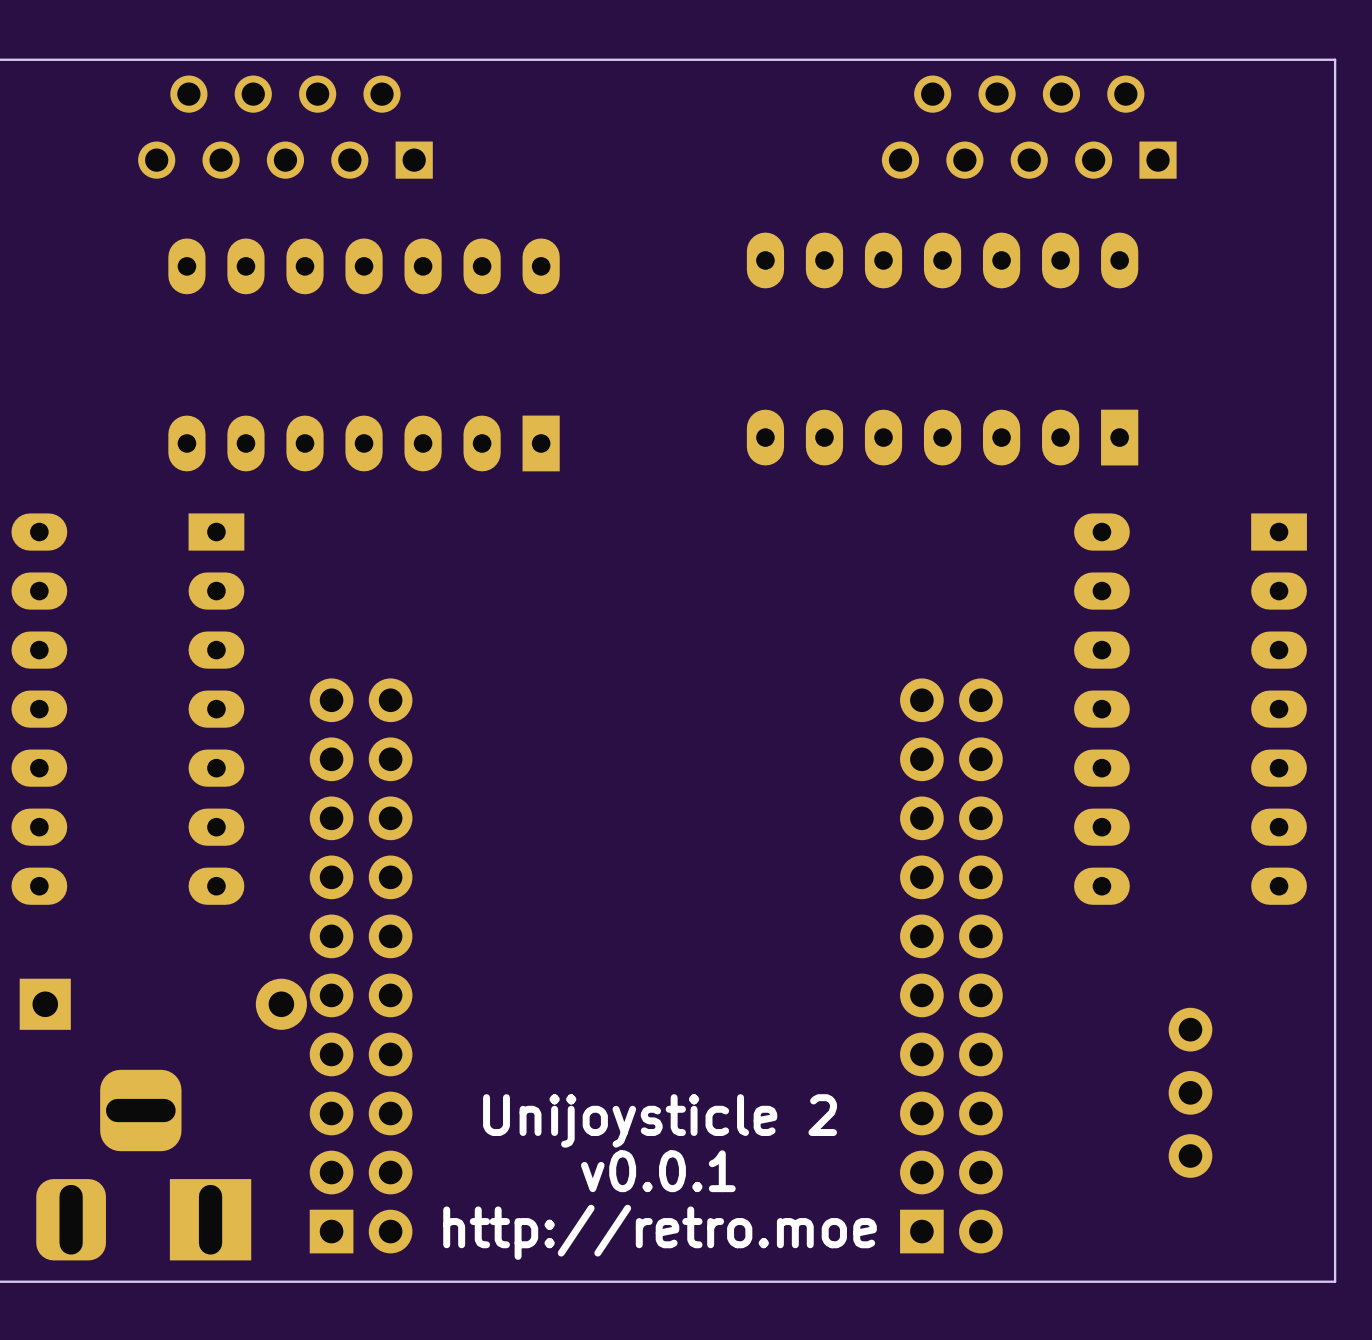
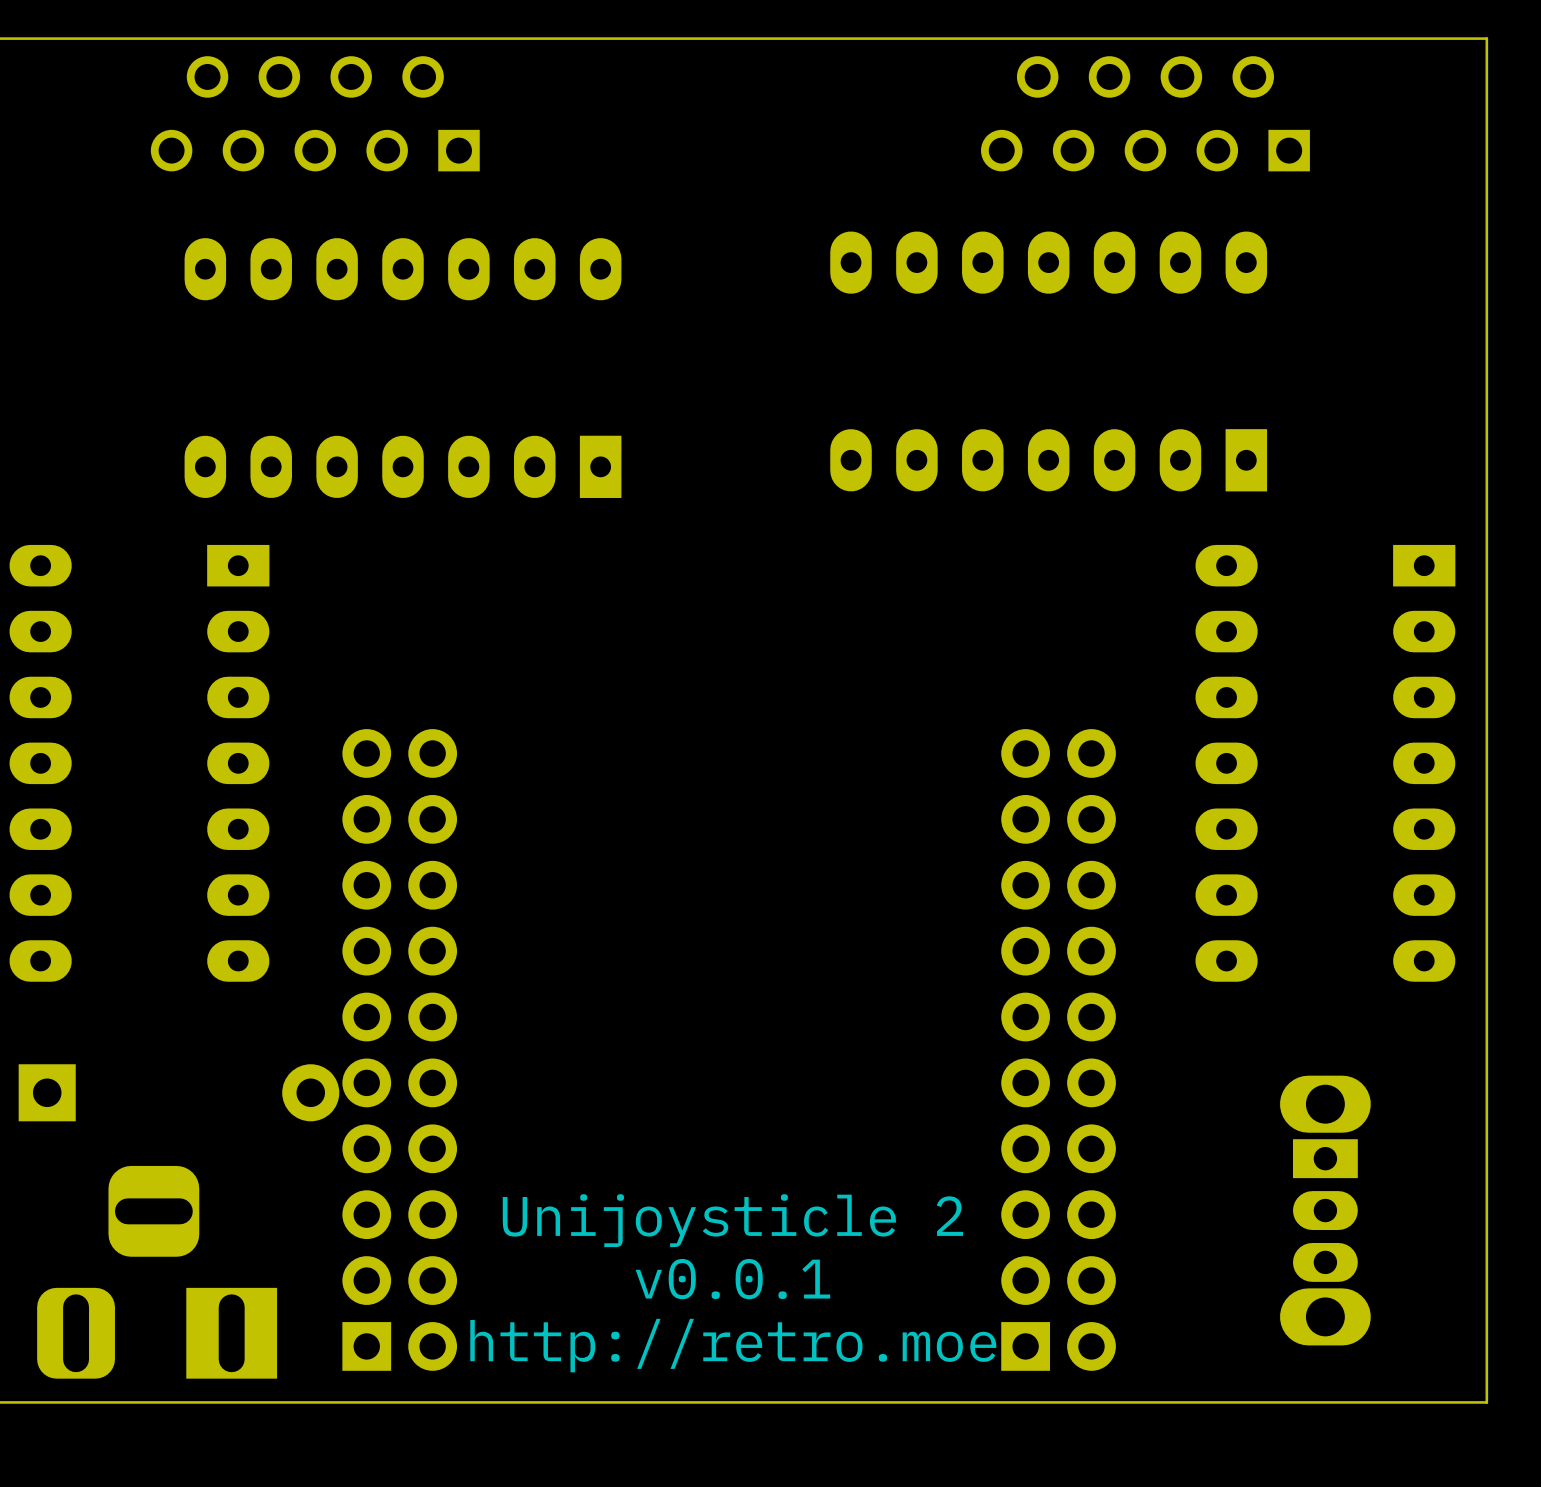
part footprint: [1168, 1007, 1213, 1178] -> [1280, 1075, 1371, 1346]

